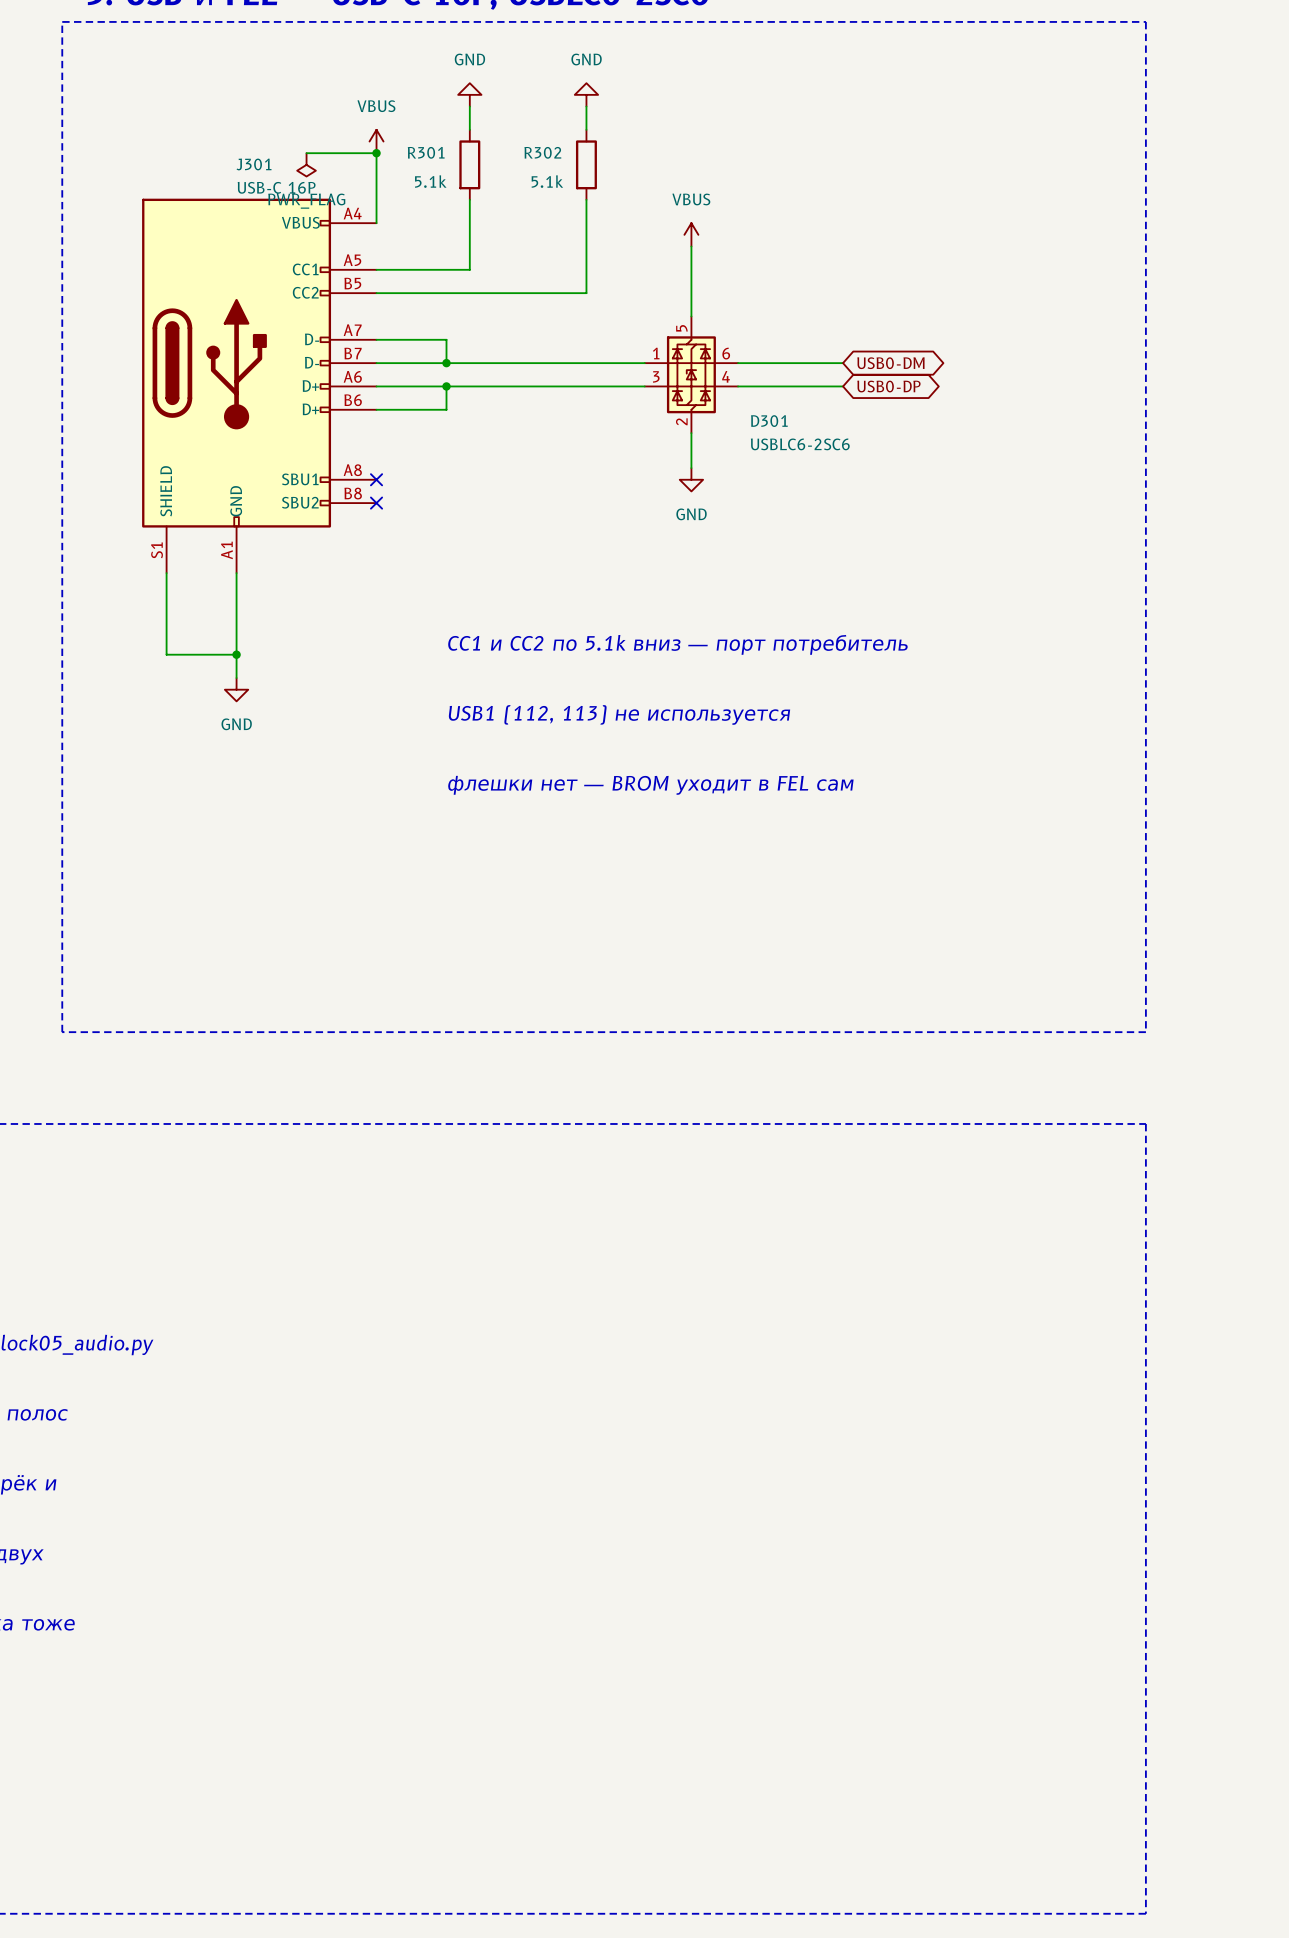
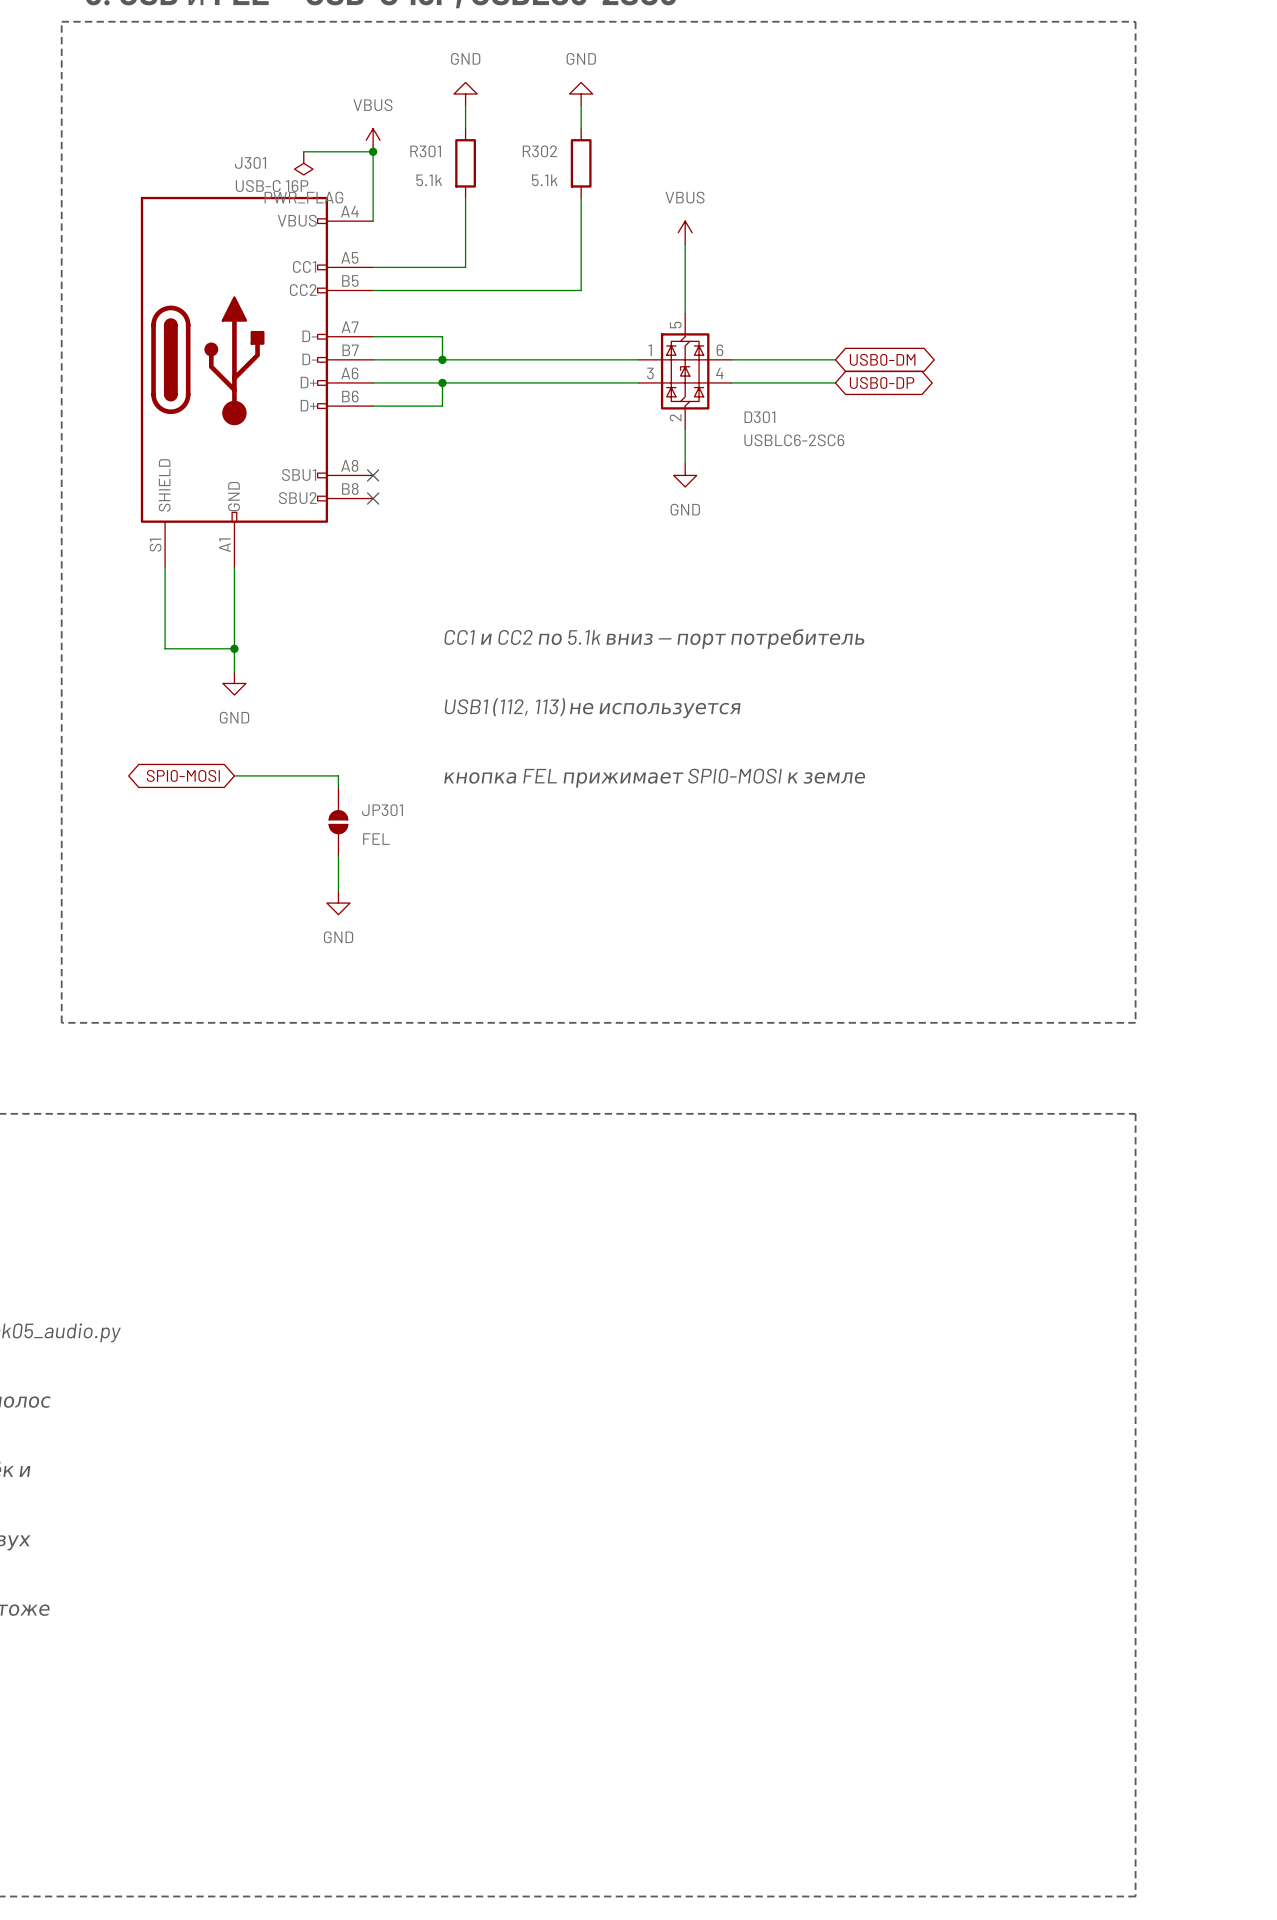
global label: none -> SPI0-MOSI (183, 775)
wire: none -> (234, 775) (338, 775) (338, 787)
text: флешки нет — BROM уходит в FEL сам (650, 785) -> кнопка FEL прижимает SPI0-MOSI к земле (654, 778)
JP301: none -> FEL (338, 822)
wire: none -> (338, 856) (338, 891)
power symbol: none -> GND (338, 903)

